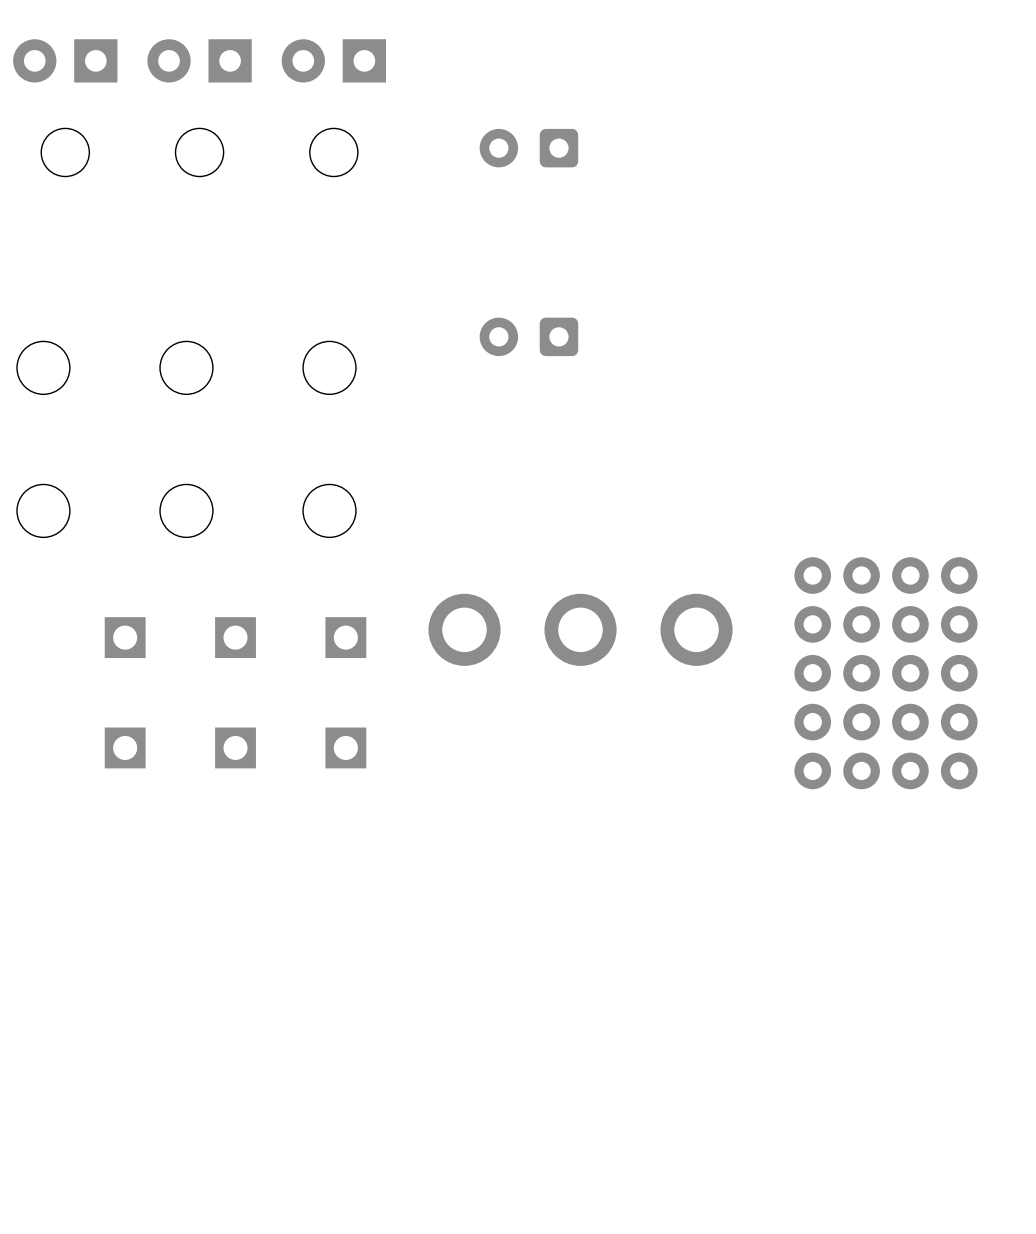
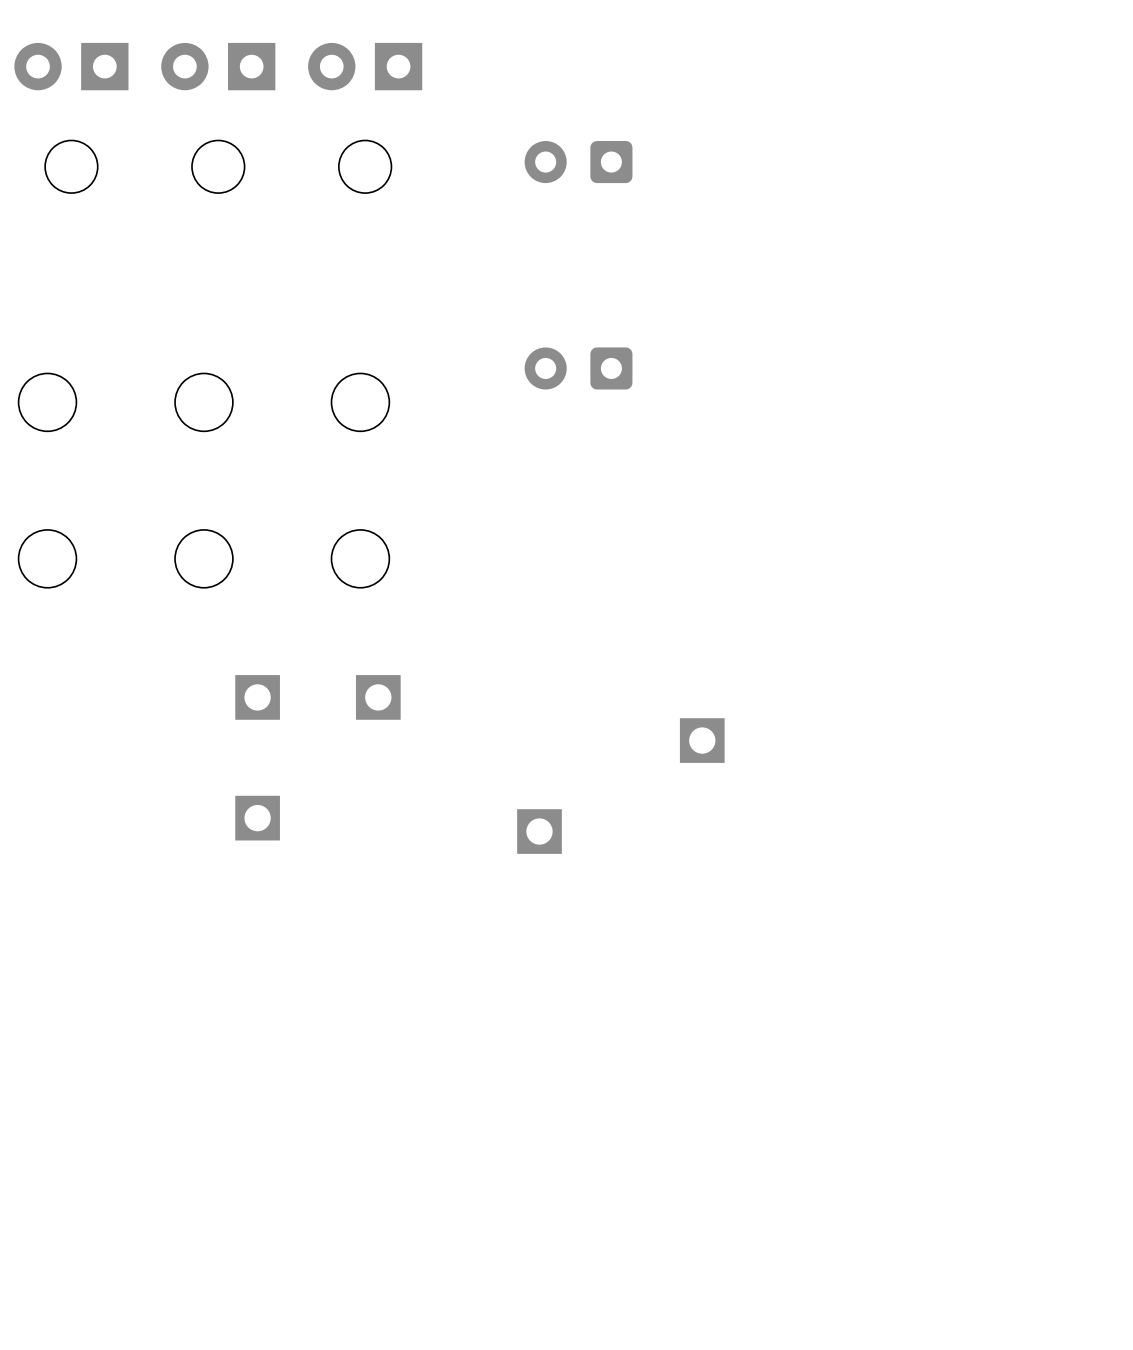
part: (580, 629) -> none
part: (125, 637) -> none
part: (886, 673) -> none
part: none -> (702, 740)
part: (125, 747) -> none
part position: (345, 747) -> (539, 831)

